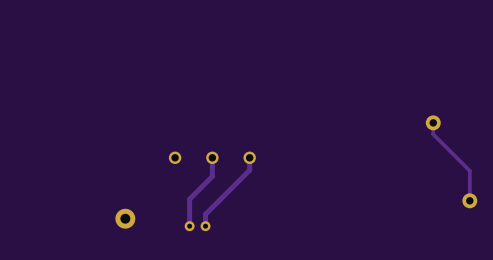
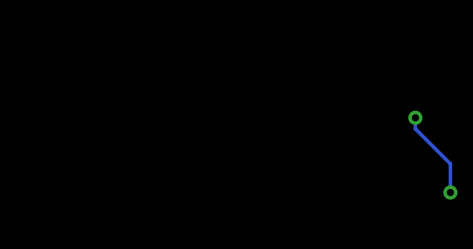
via: (175, 157) -> none
track: (212, 157) (212, 176) (189, 199) (189, 226) -> none
via: (212, 157) -> none
track: (249, 157) (249, 170) (205, 214) (205, 226) -> none
via: (249, 157) -> none
via: (125, 218) -> none
via: (189, 226) -> none
via: (205, 226) -> none

